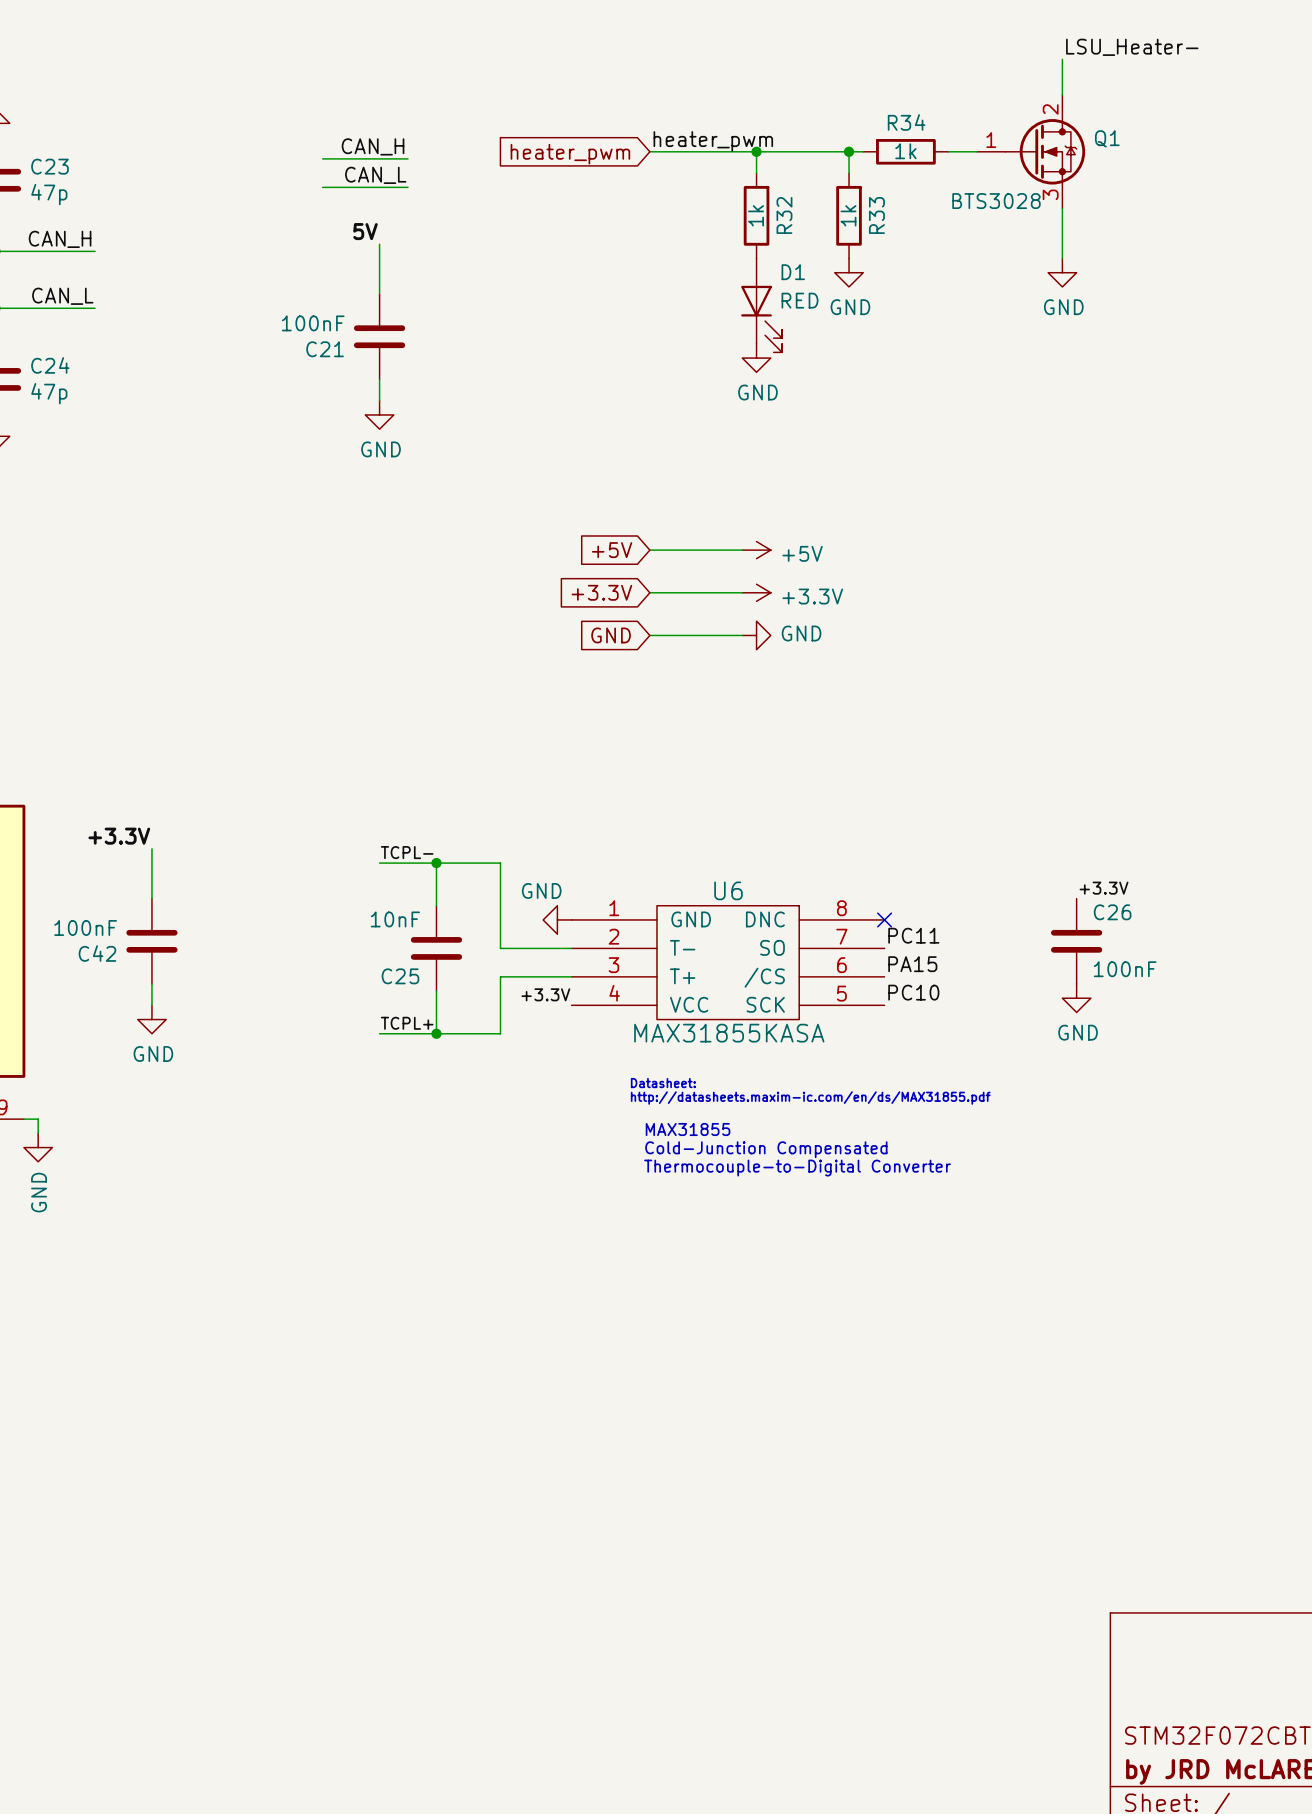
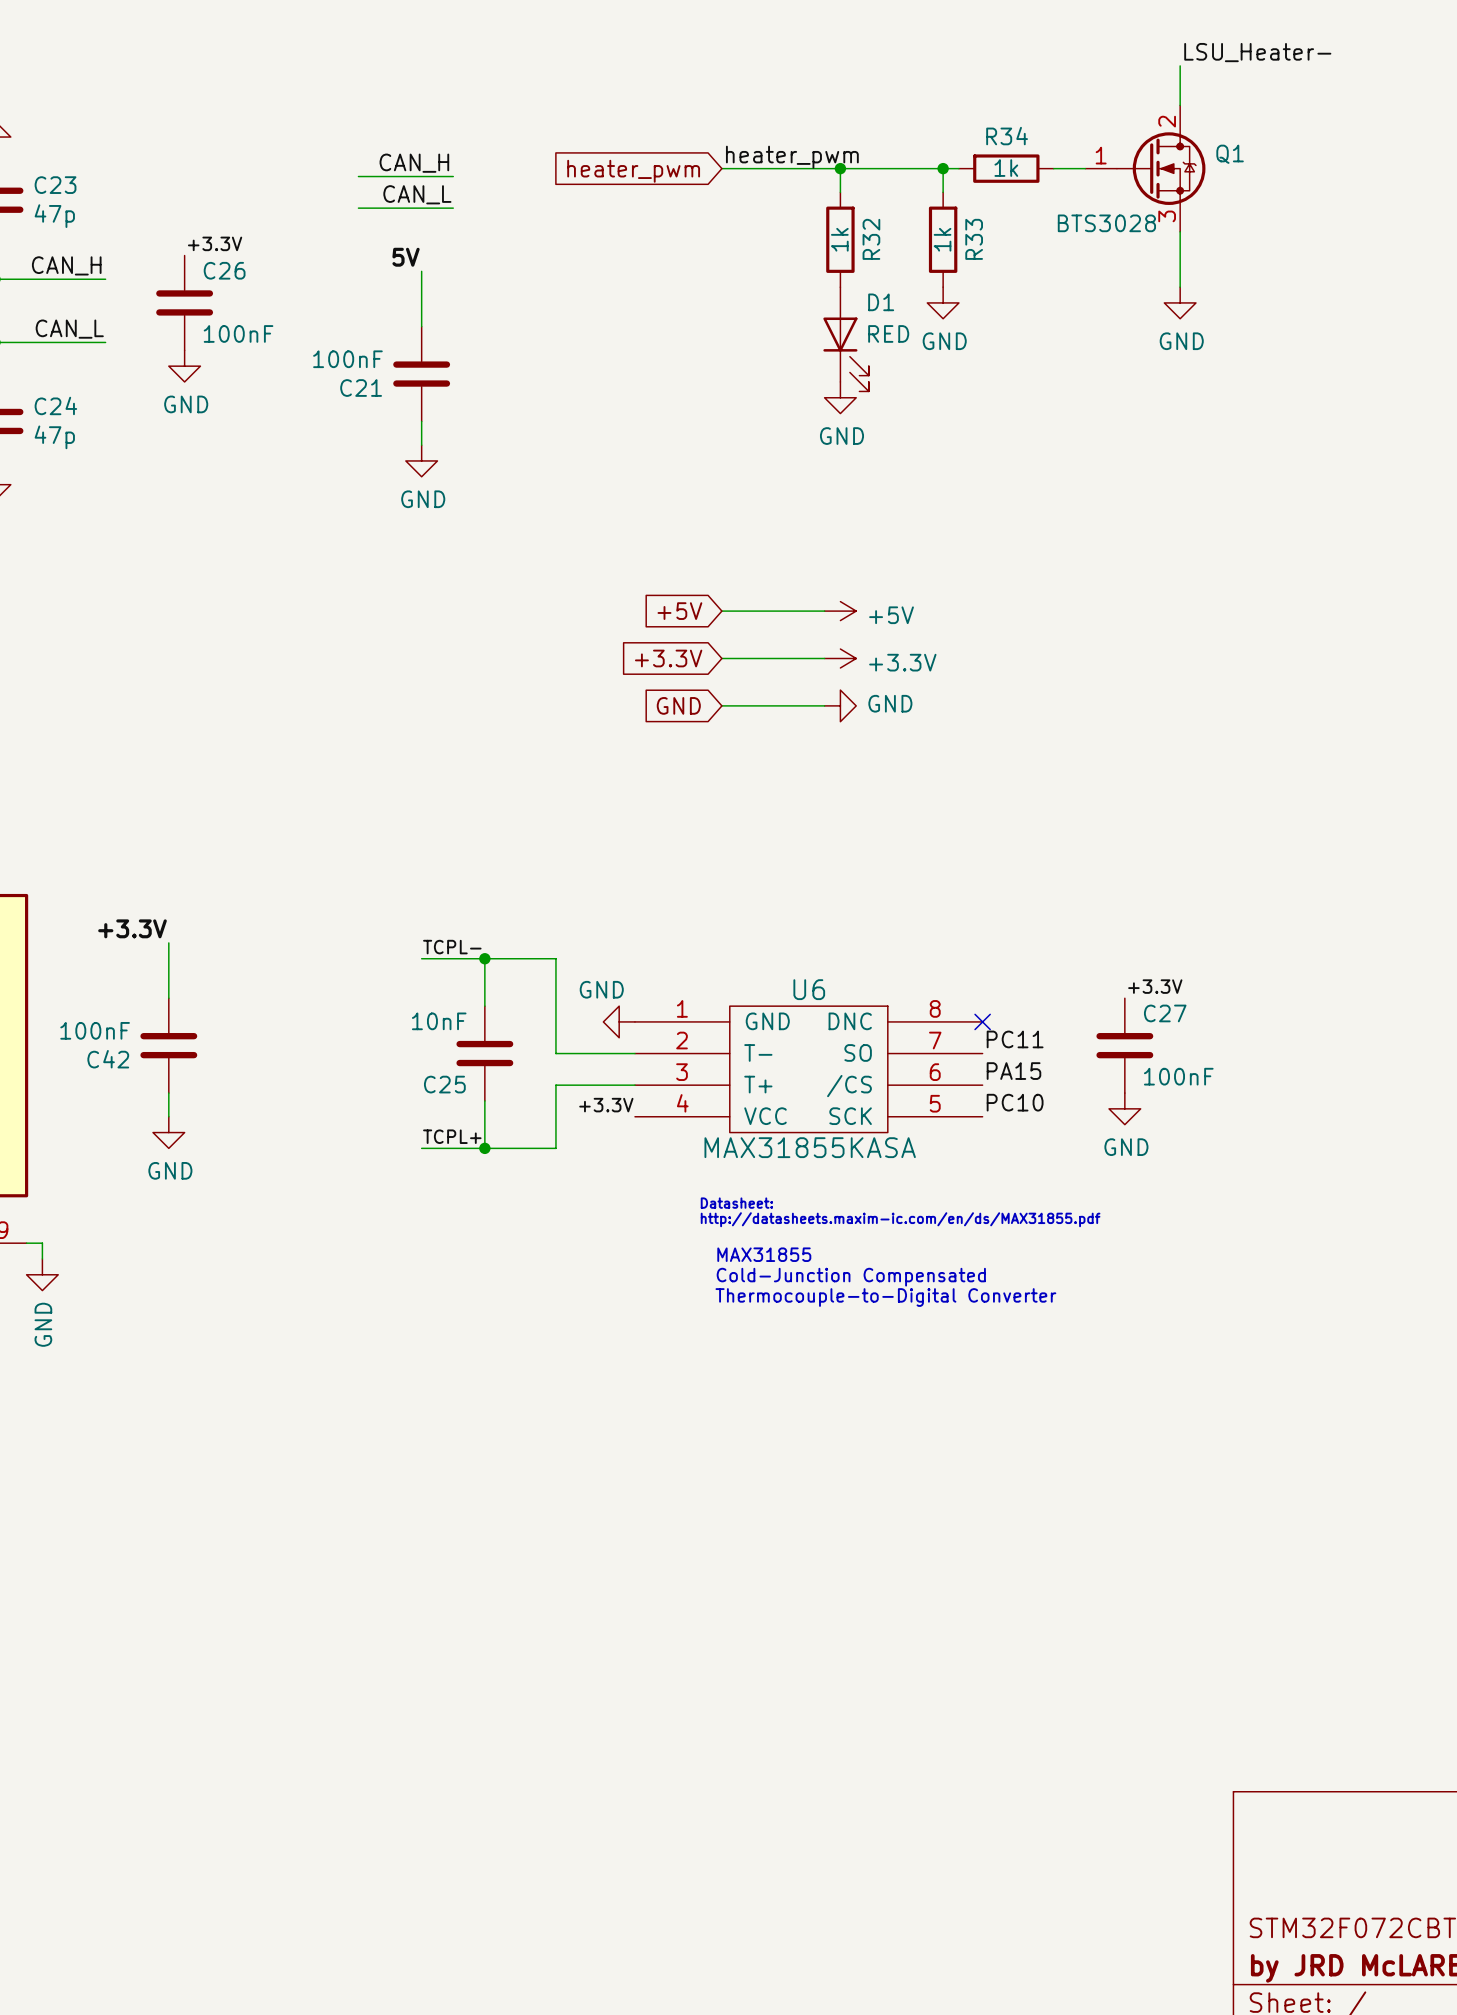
label: none -> +3.3V (215, 243)
power symbol: none -> GND (184, 366)
label position: +3.3V (1104, 888) -> +3.3V (1155, 986)
C27: none -> 100nF (1124, 1045)
C26 position: (1076, 941) -> (184, 302)
power symbol position: GND (1076, 998) -> GND (1124, 1108)

